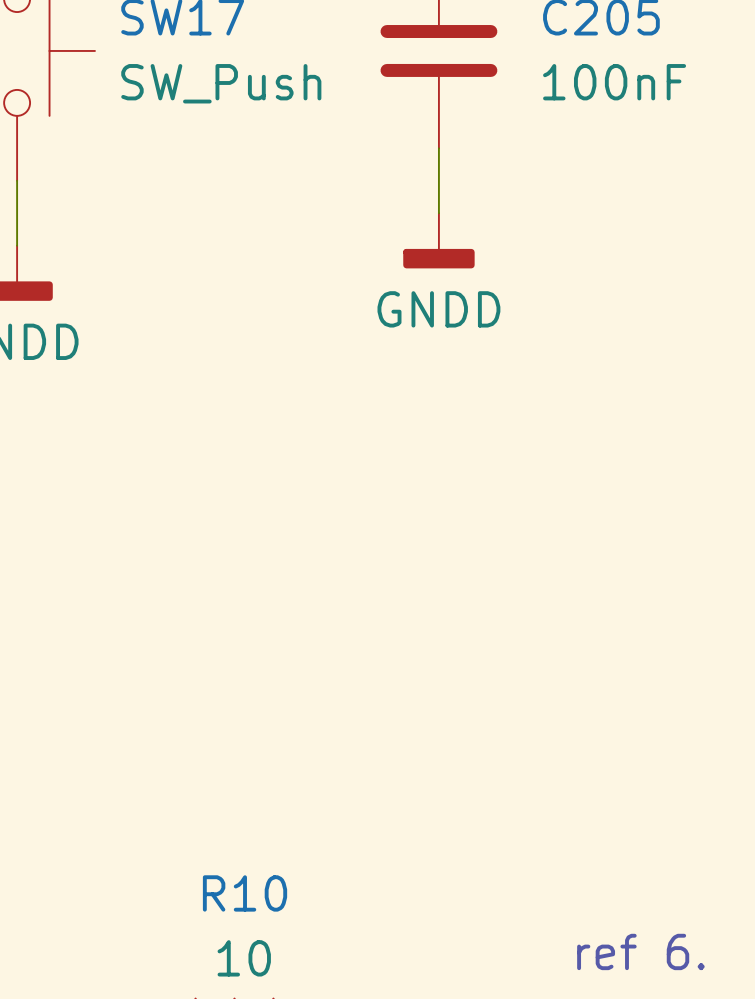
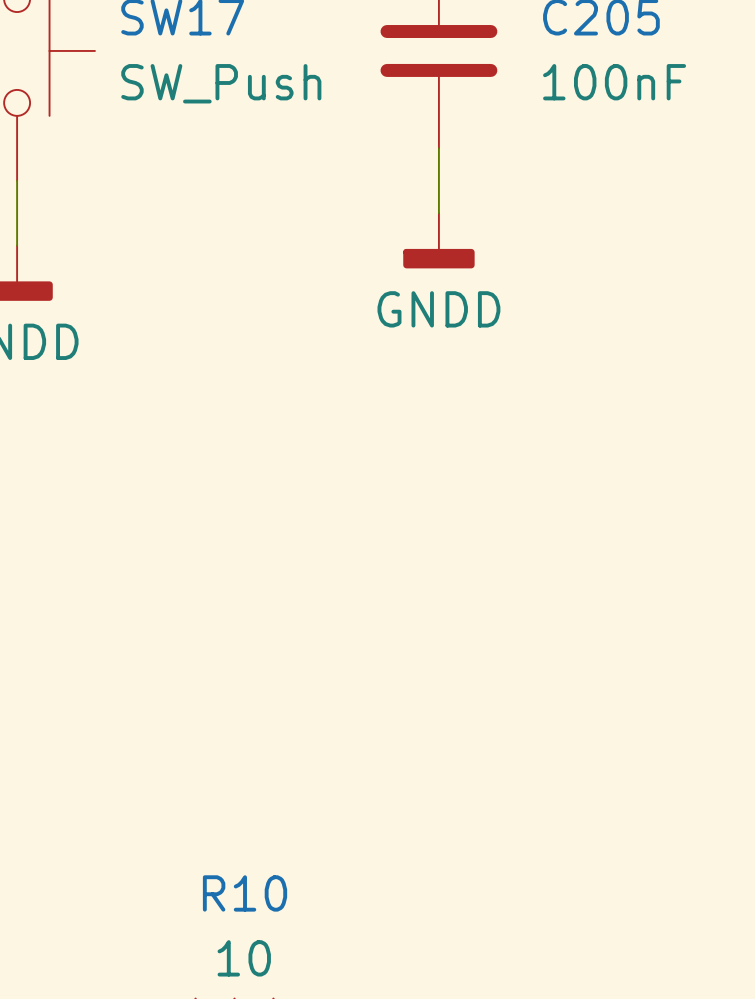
text: ref 6. (640, 951) -> none

